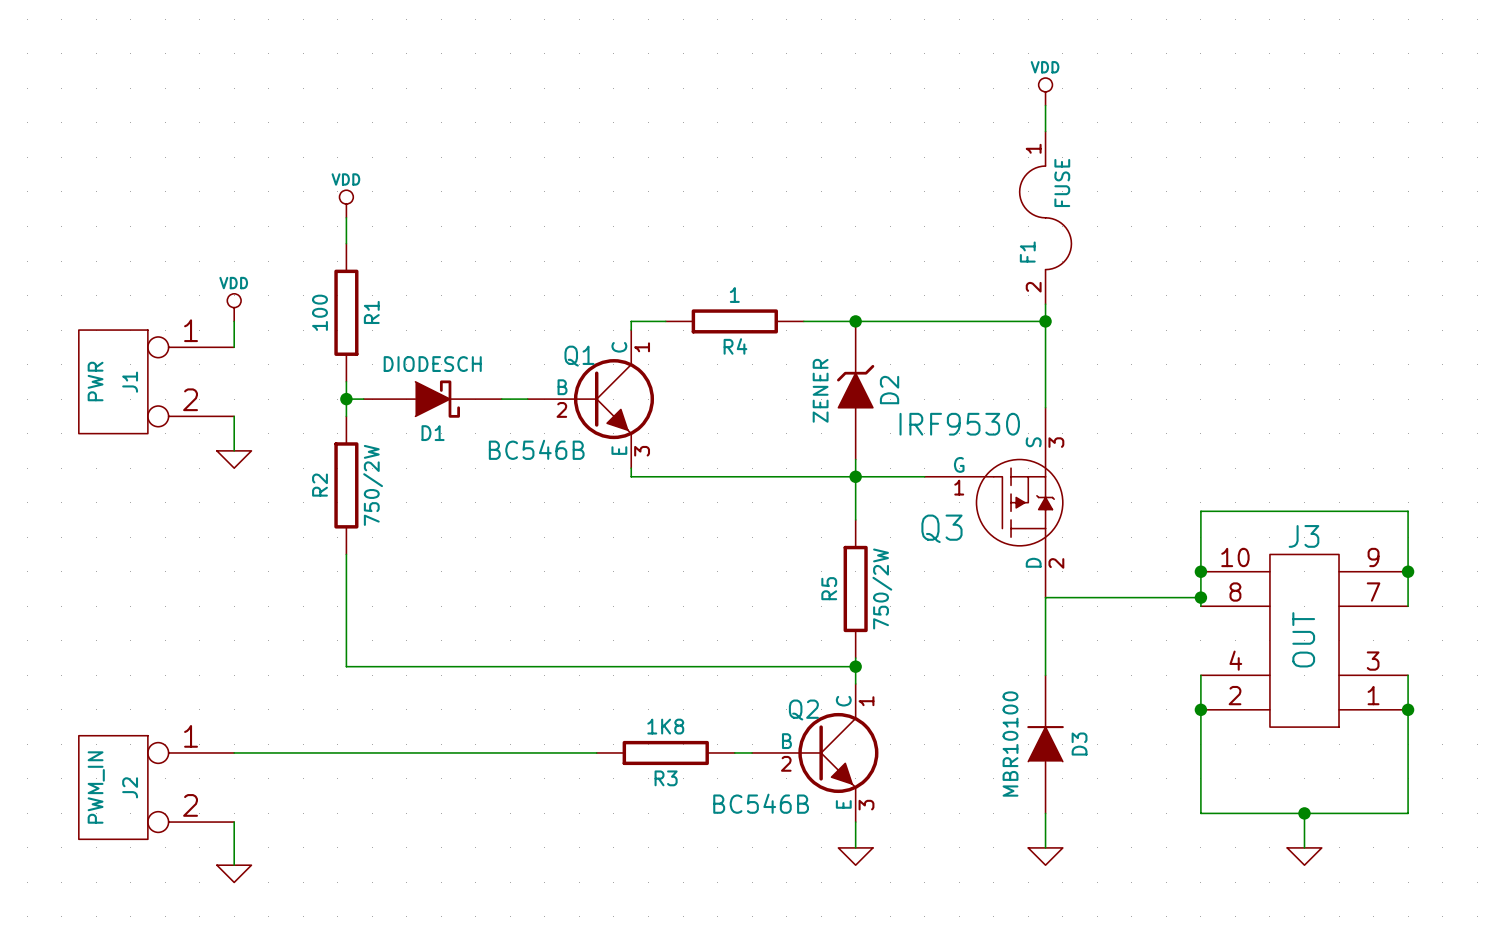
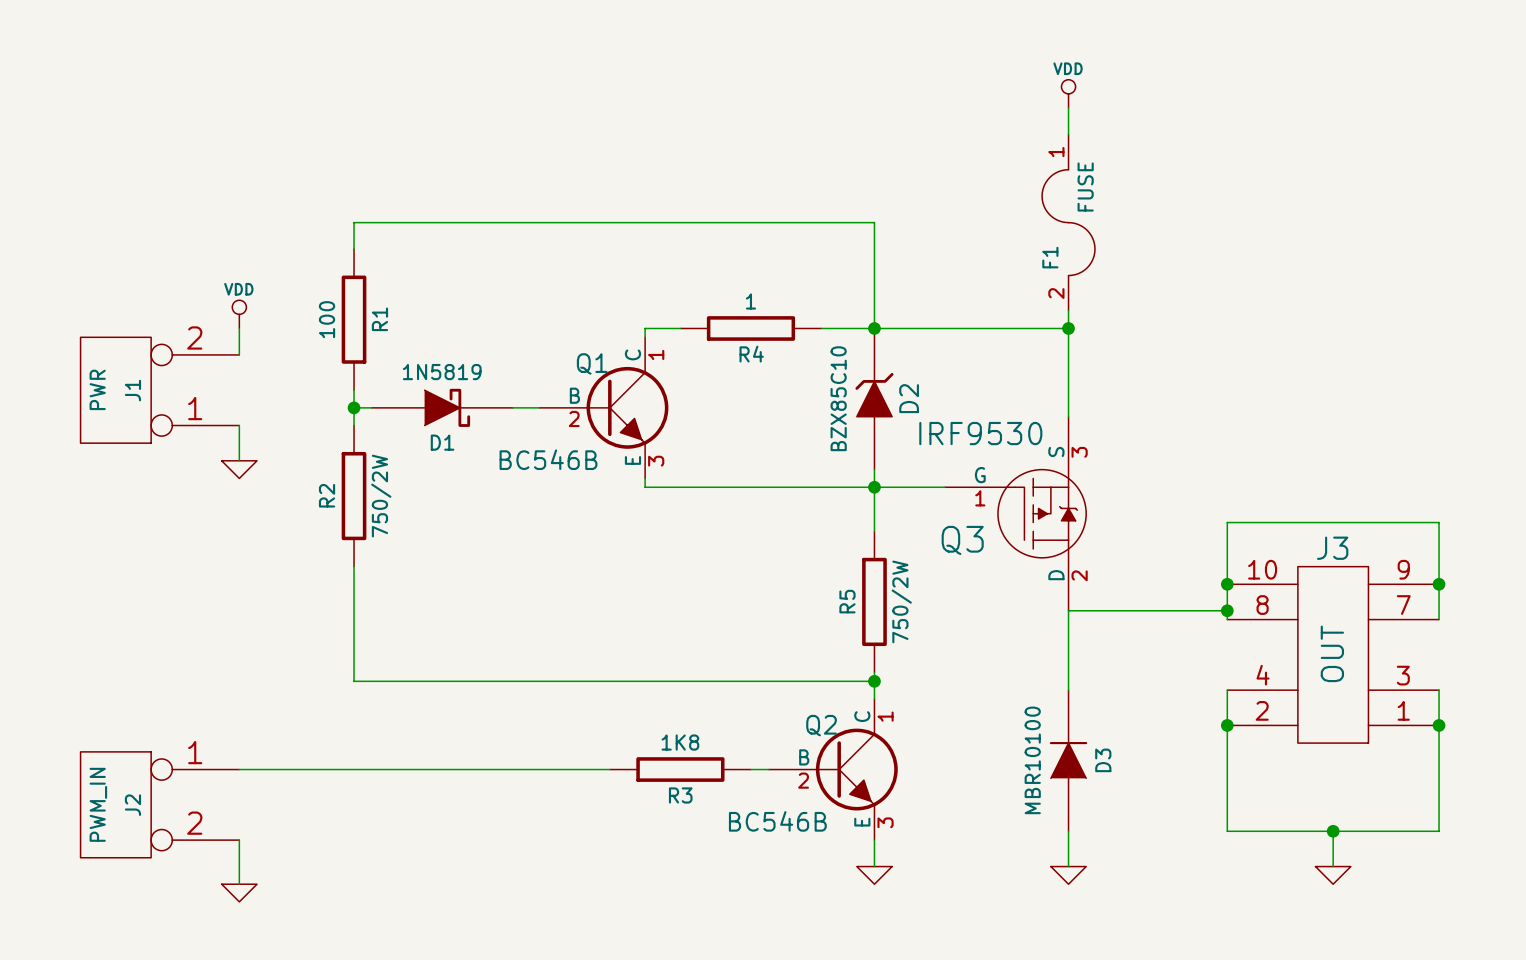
power symbol: VDD (346, 204) -> none
wire: none -> (354, 222) (874, 222) (874, 328)
D1 value: DIODESCH (432, 364) -> 1N5819 (442, 372)
J1 flip: as is (113, 381) -> up-down (115, 390)
D2 value: ZENER (820, 390) -> BZX85C10 (838, 398)

